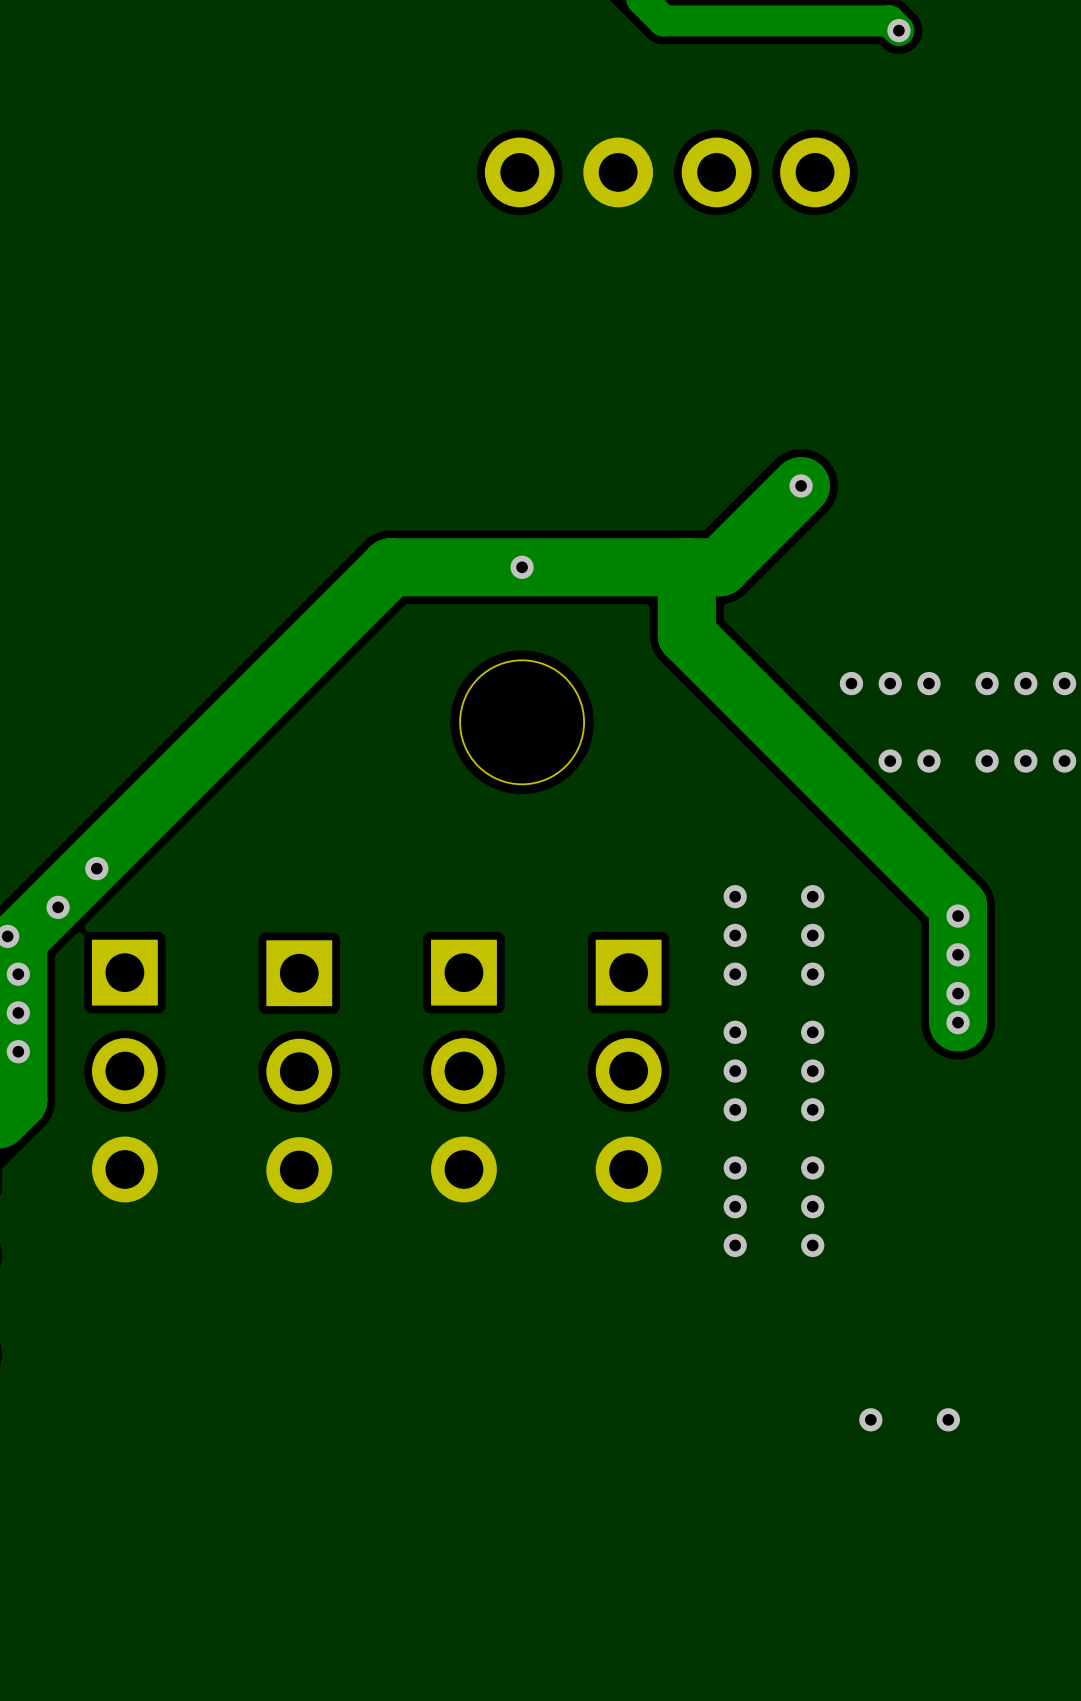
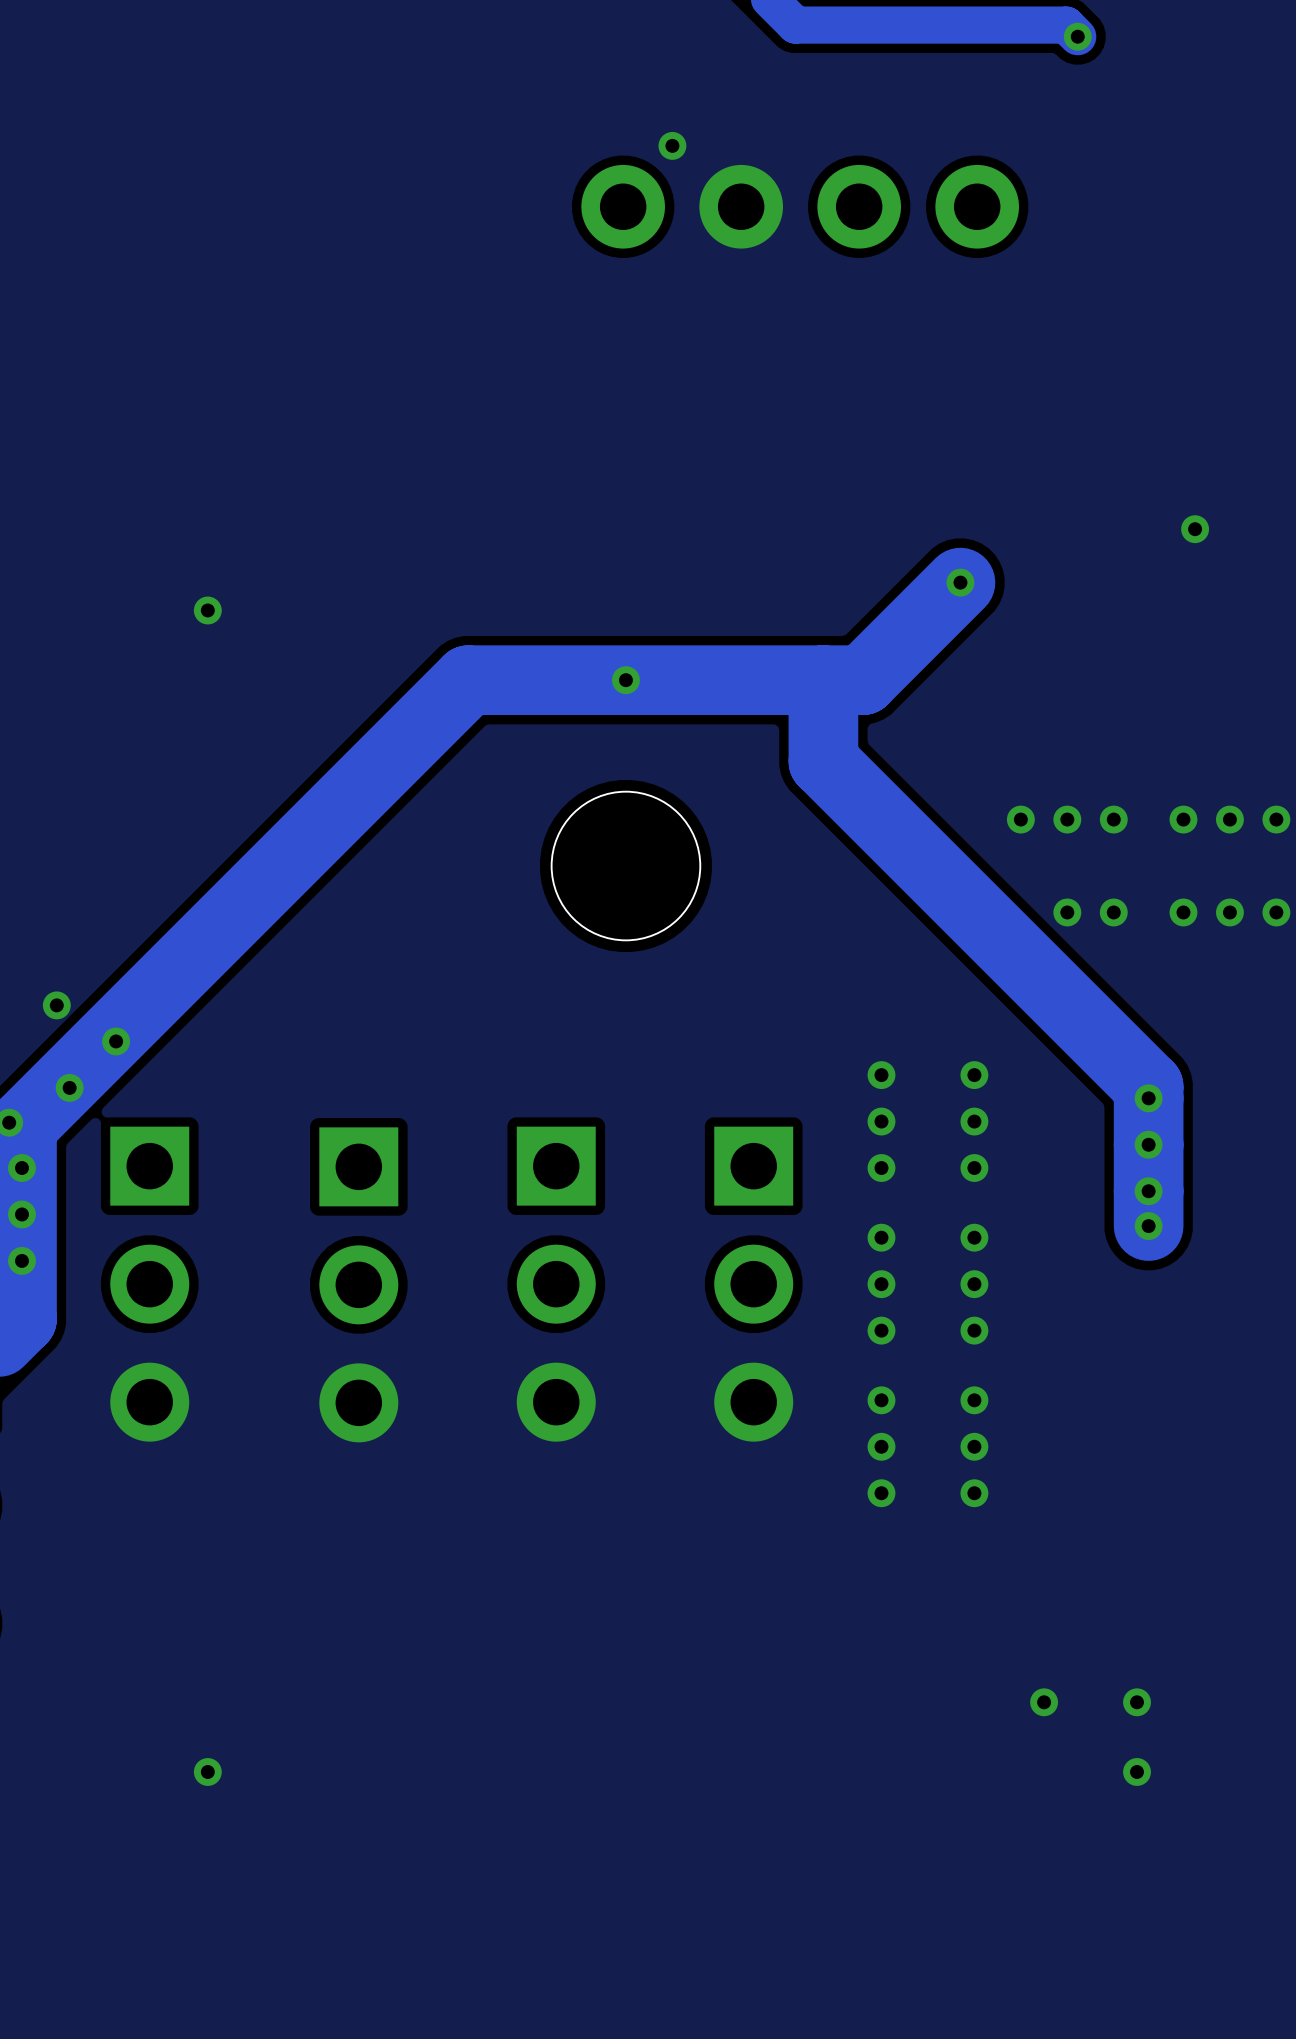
via: none -> (672, 145)
via: none -> (1195, 529)
via: none -> (207, 610)
via: none -> (56, 1005)
via: none -> (207, 1771)
via: none -> (1137, 1771)

